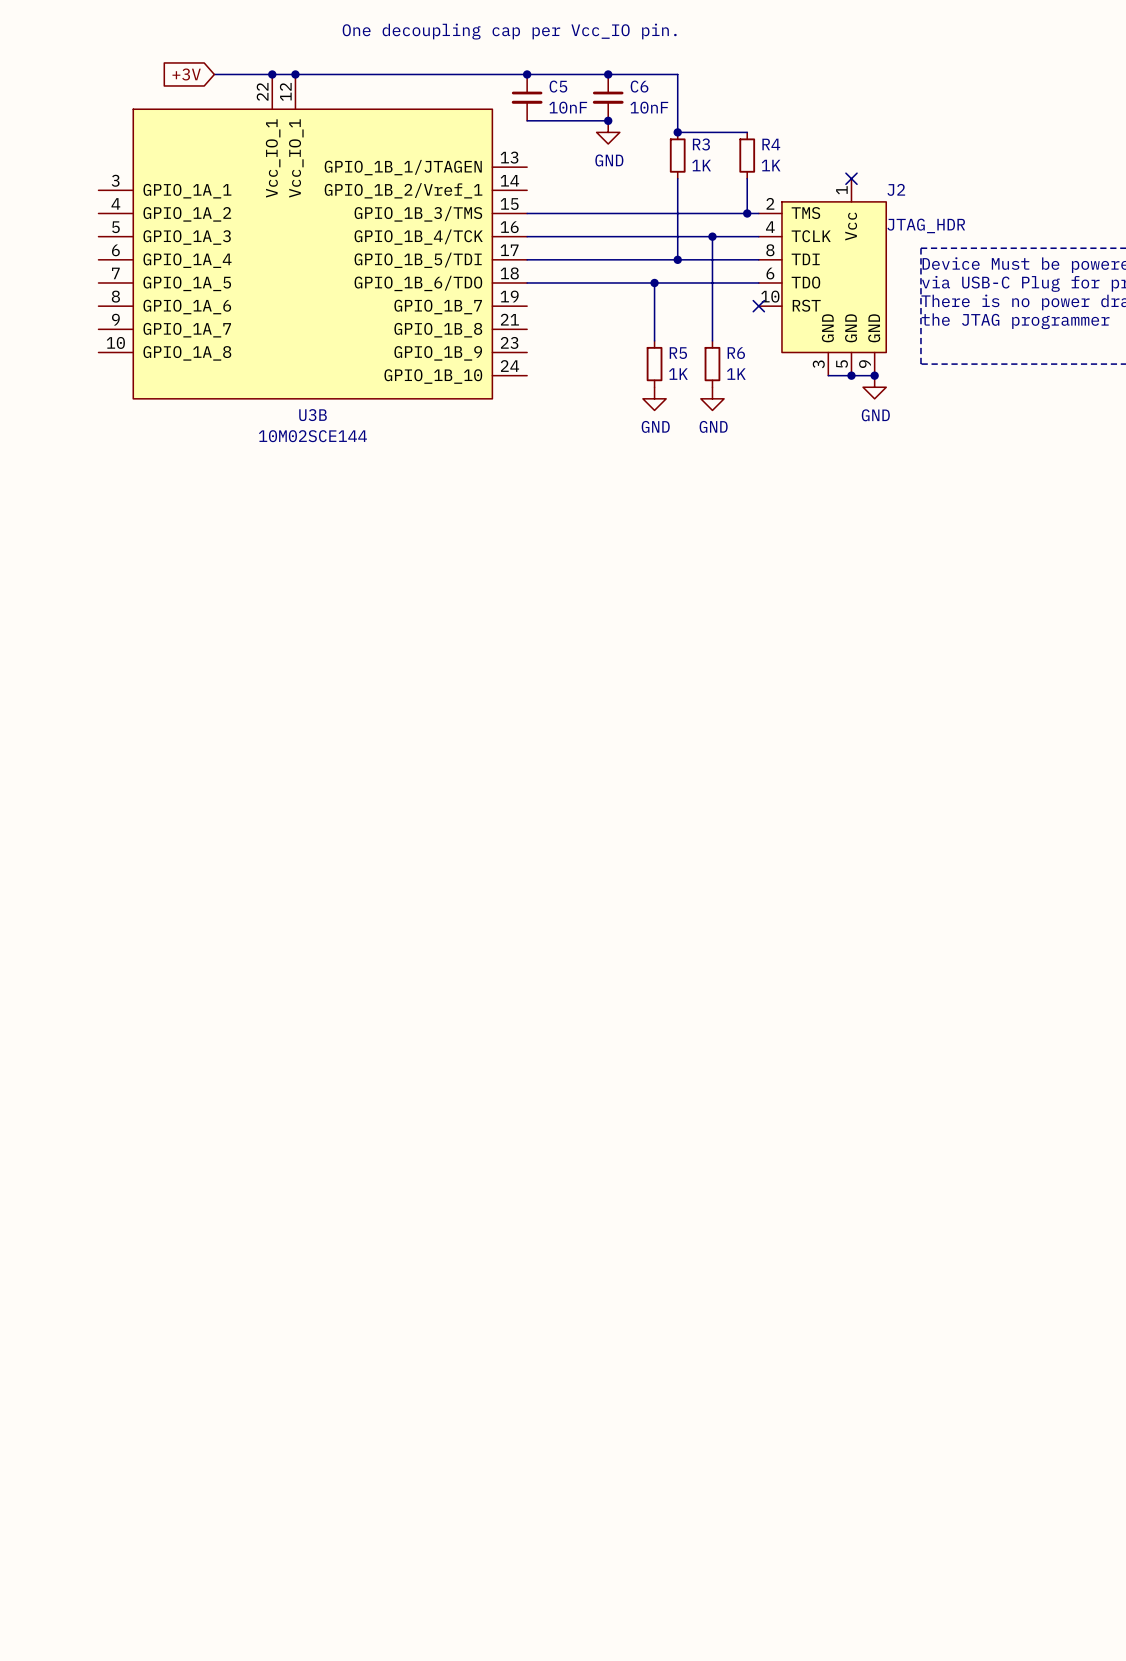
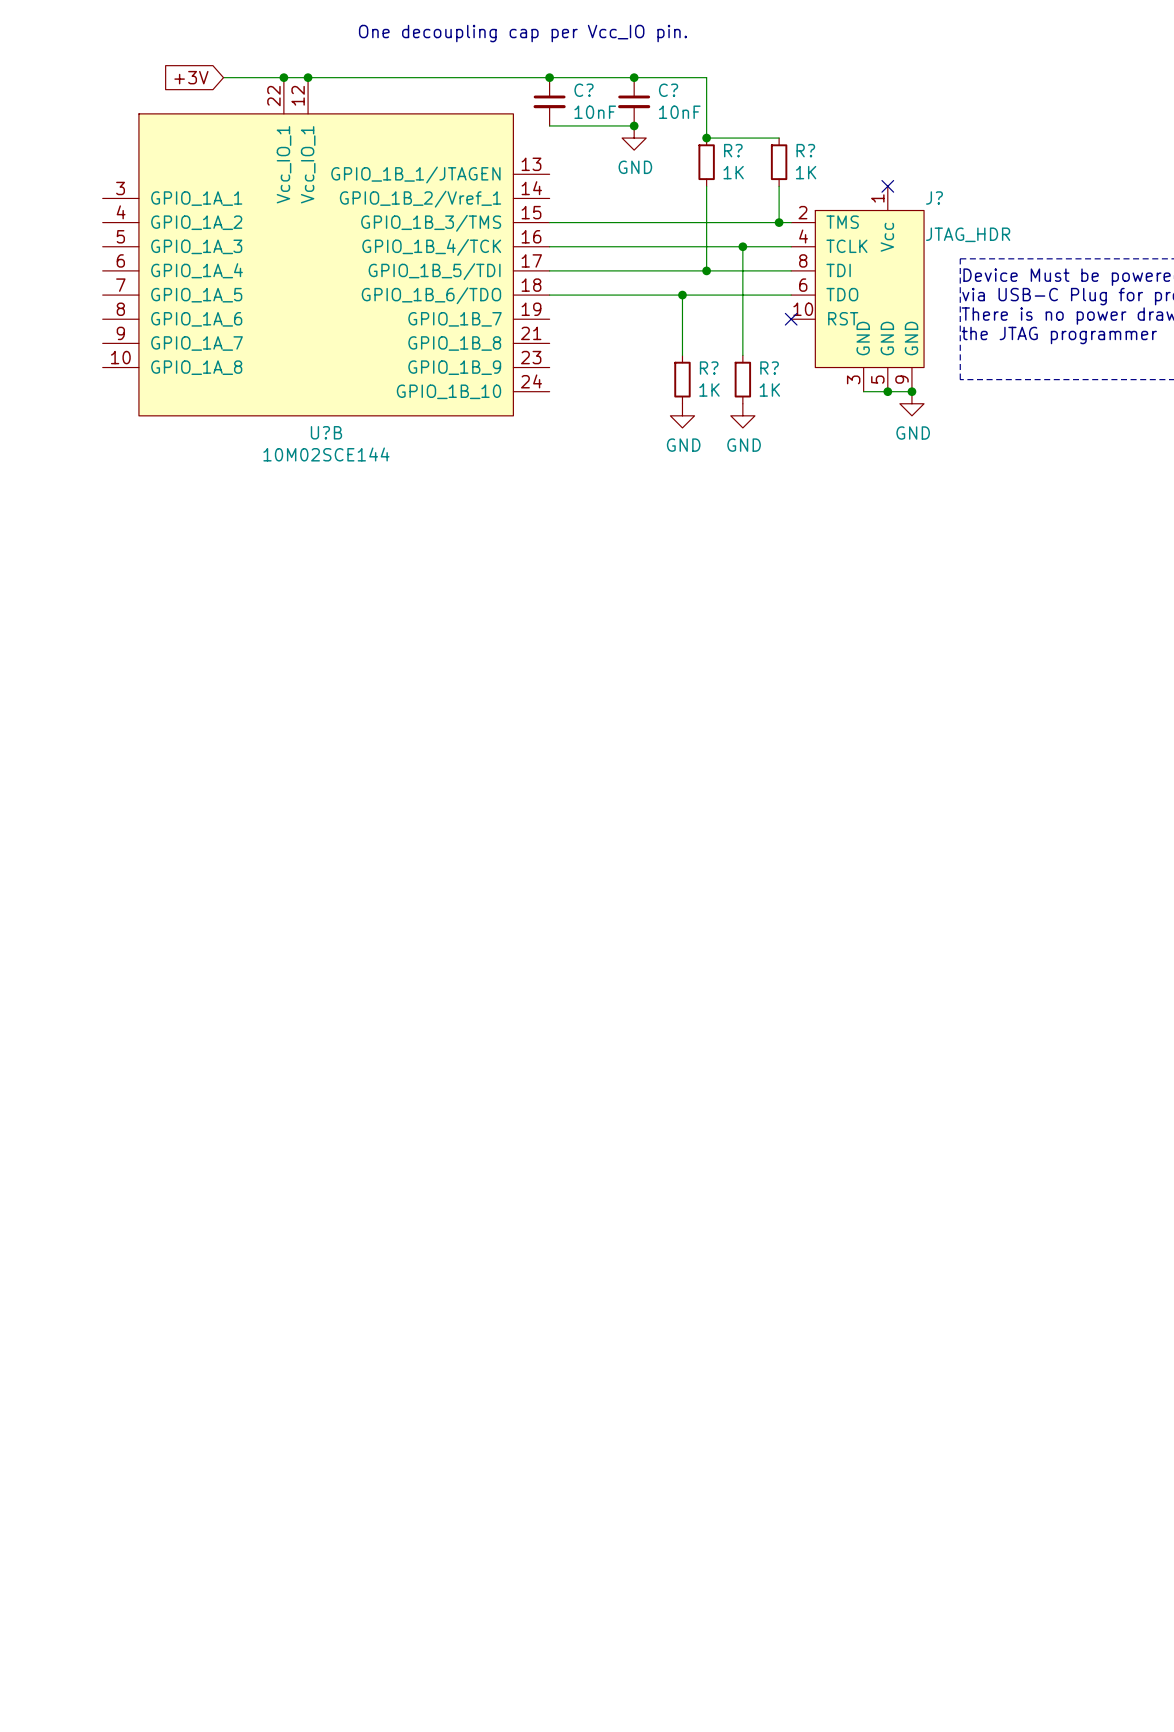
C5 name: C5 (558, 86) -> C? (584, 90)
C6 name: C6 (639, 86) -> C? (668, 90)
R3 name: R3 (701, 144) -> R? (733, 150)
R4 name: R4 (771, 144) -> R? (805, 150)
J2 name: J2 (896, 189) -> J? (934, 197)
R5 name: R5 (678, 353) -> R? (709, 368)
R6 name: R6 (736, 353) -> R? (769, 368)
U3B name: U3B (313, 415) -> U?B (326, 432)

